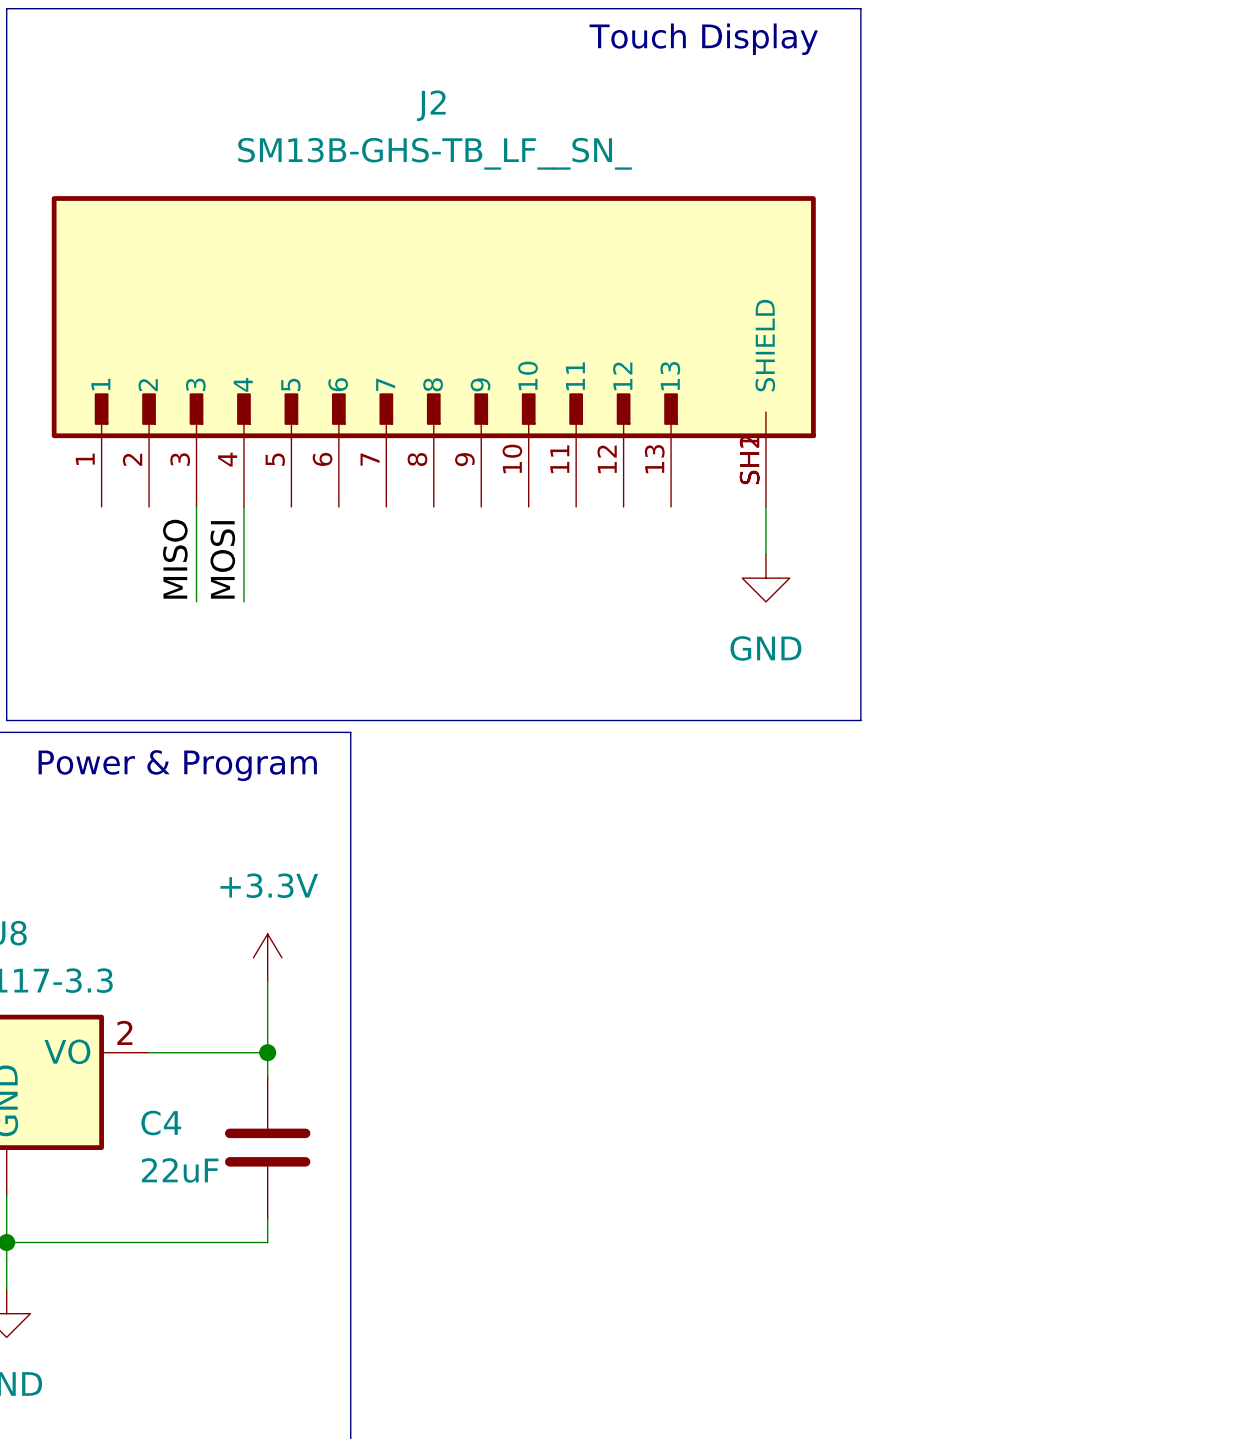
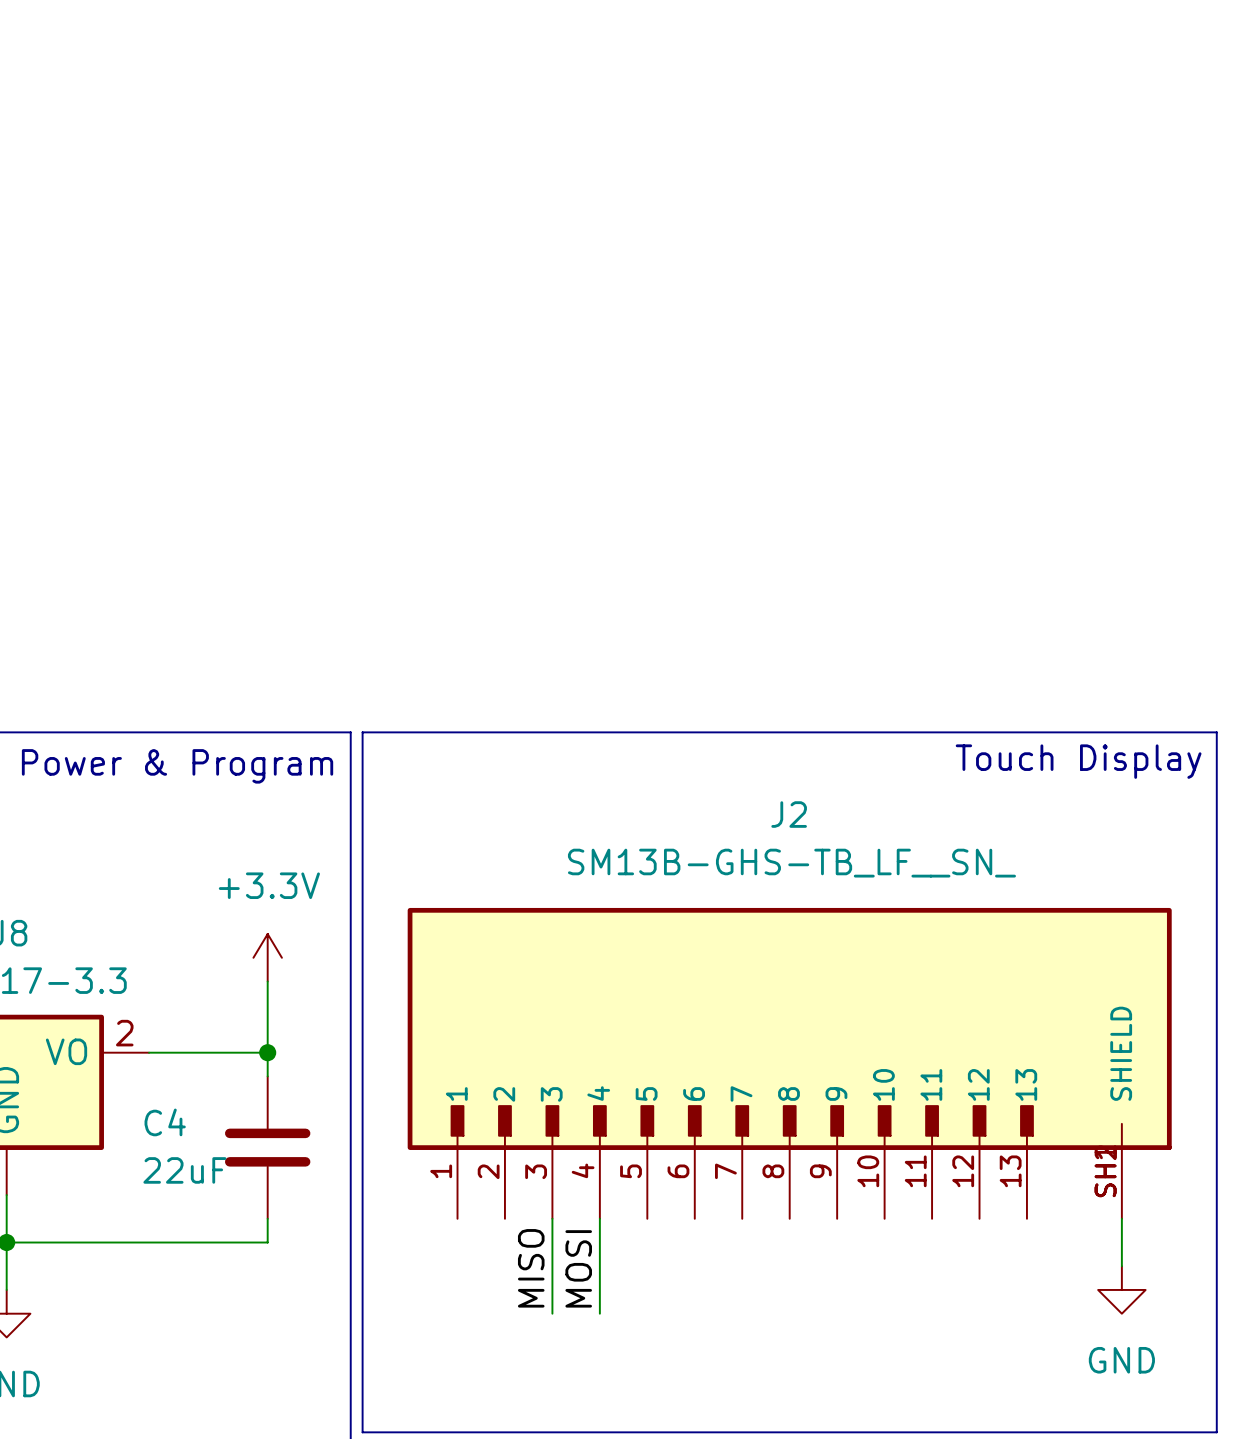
line: (6, 8) (860, 8) (860, 720) (6, 720) (6, 8) -> none
text: Touch Display (703, 39) -> none
J2 position: (433, 351) -> (789, 1063)
wire: (196, 506) (196, 601) -> none
wire: (243, 506) (243, 601) -> none
wire: (765, 506) (765, 554) -> none
label: MISO (175, 559) -> none
label: MOSI (222, 559) -> none
power symbol: GND (765, 578) -> none
line: none -> (362, 732) (1216, 732) (1216, 1432) (362, 1432) (362, 732)
text: none -> Touch Display (1078, 761)
wire: none -> (552, 1218) (552, 1313)
wire: none -> (599, 1218) (599, 1313)
wire: none -> (1121, 1218) (1121, 1266)
label: none -> MISO (531, 1268)
label: none -> MOSI (578, 1268)
power symbol: none -> GND (1121, 1289)

